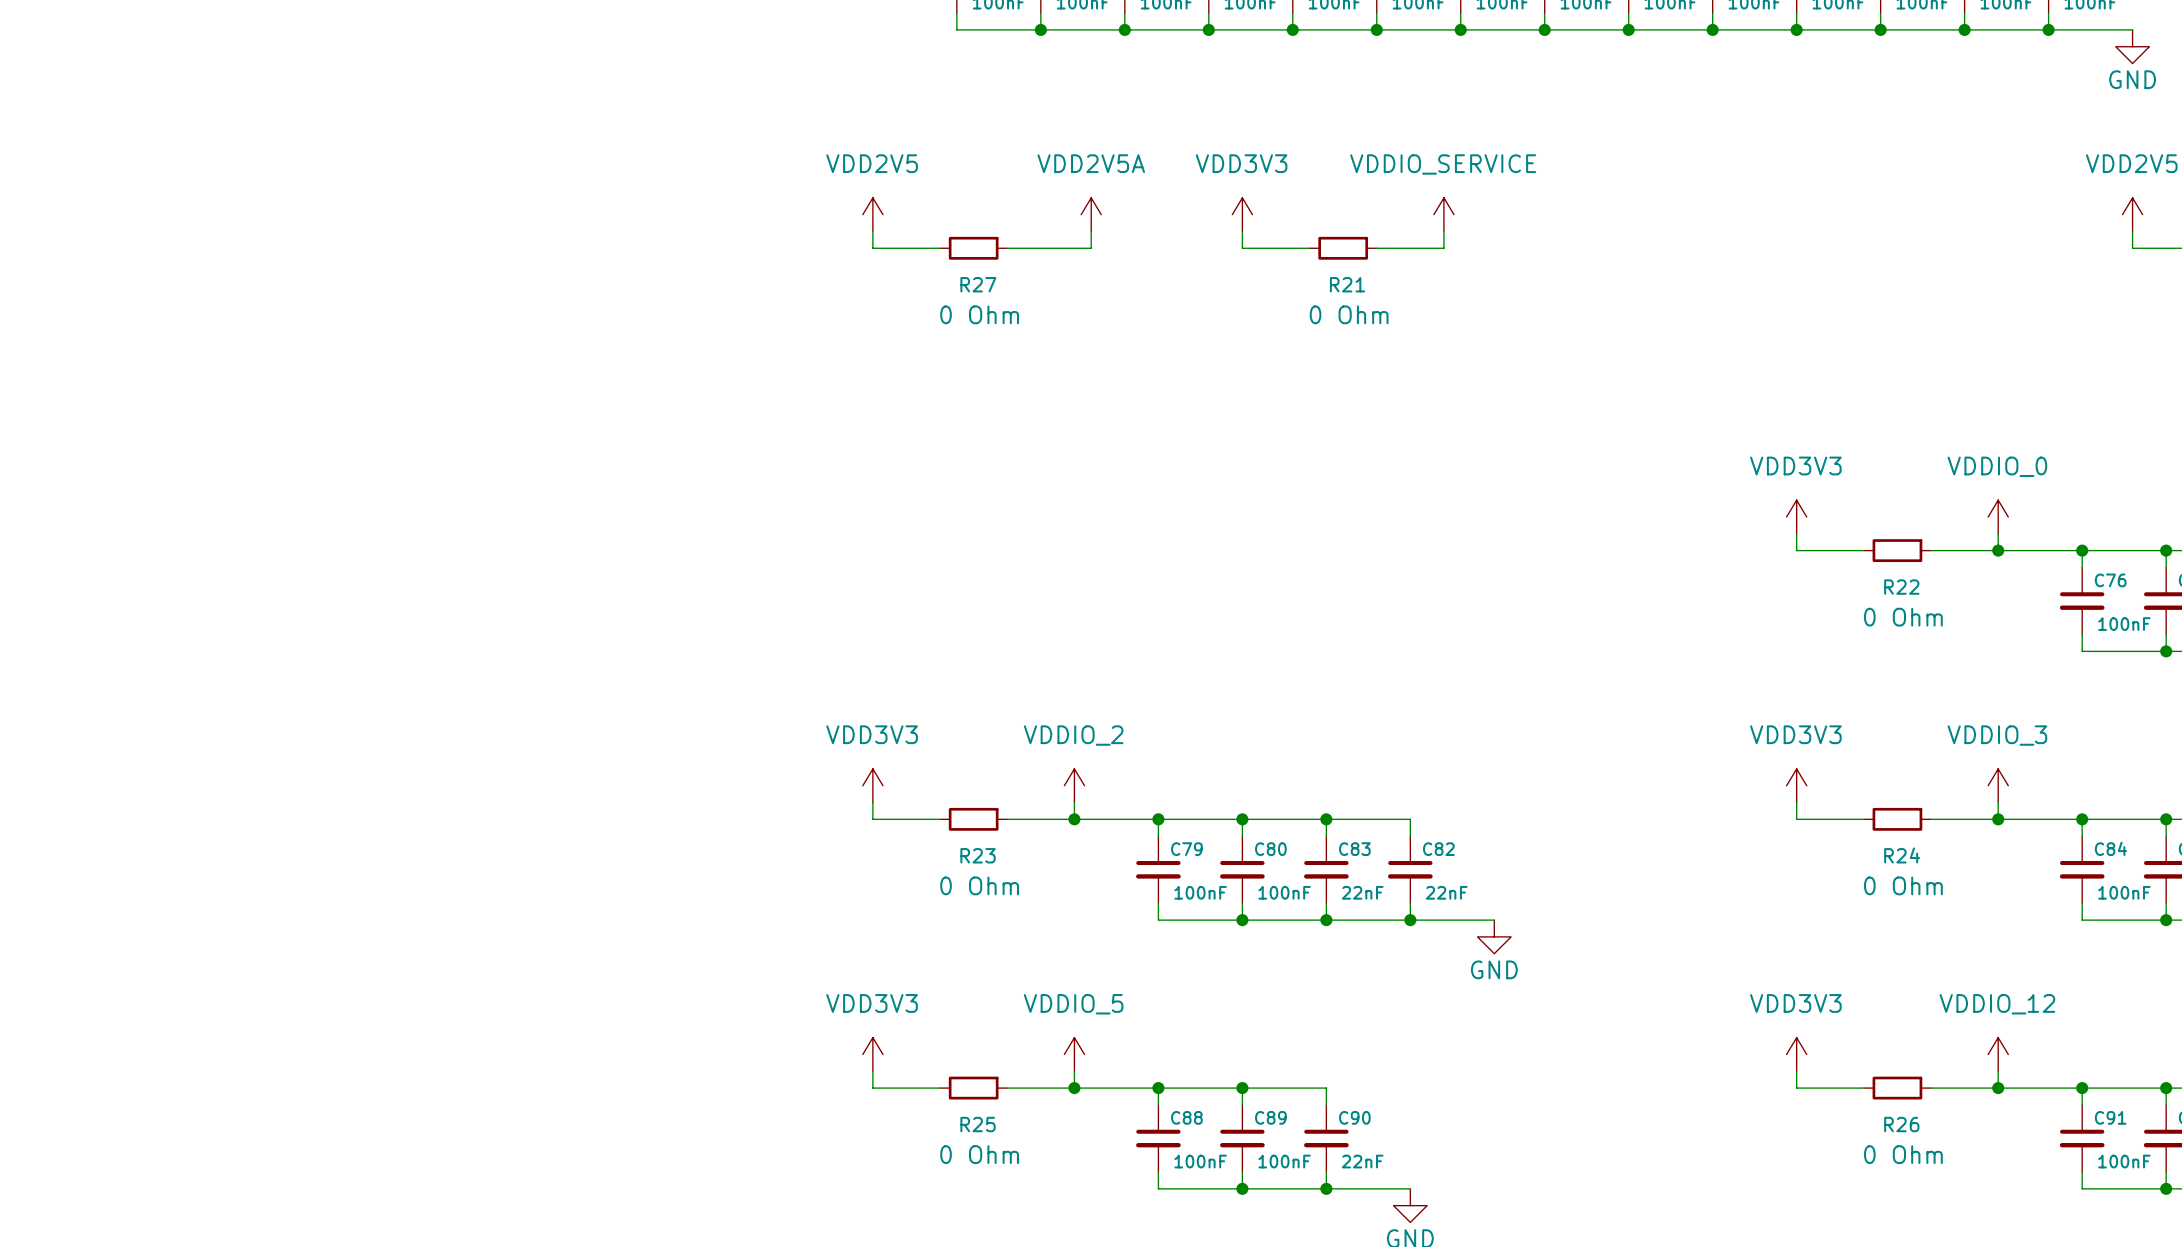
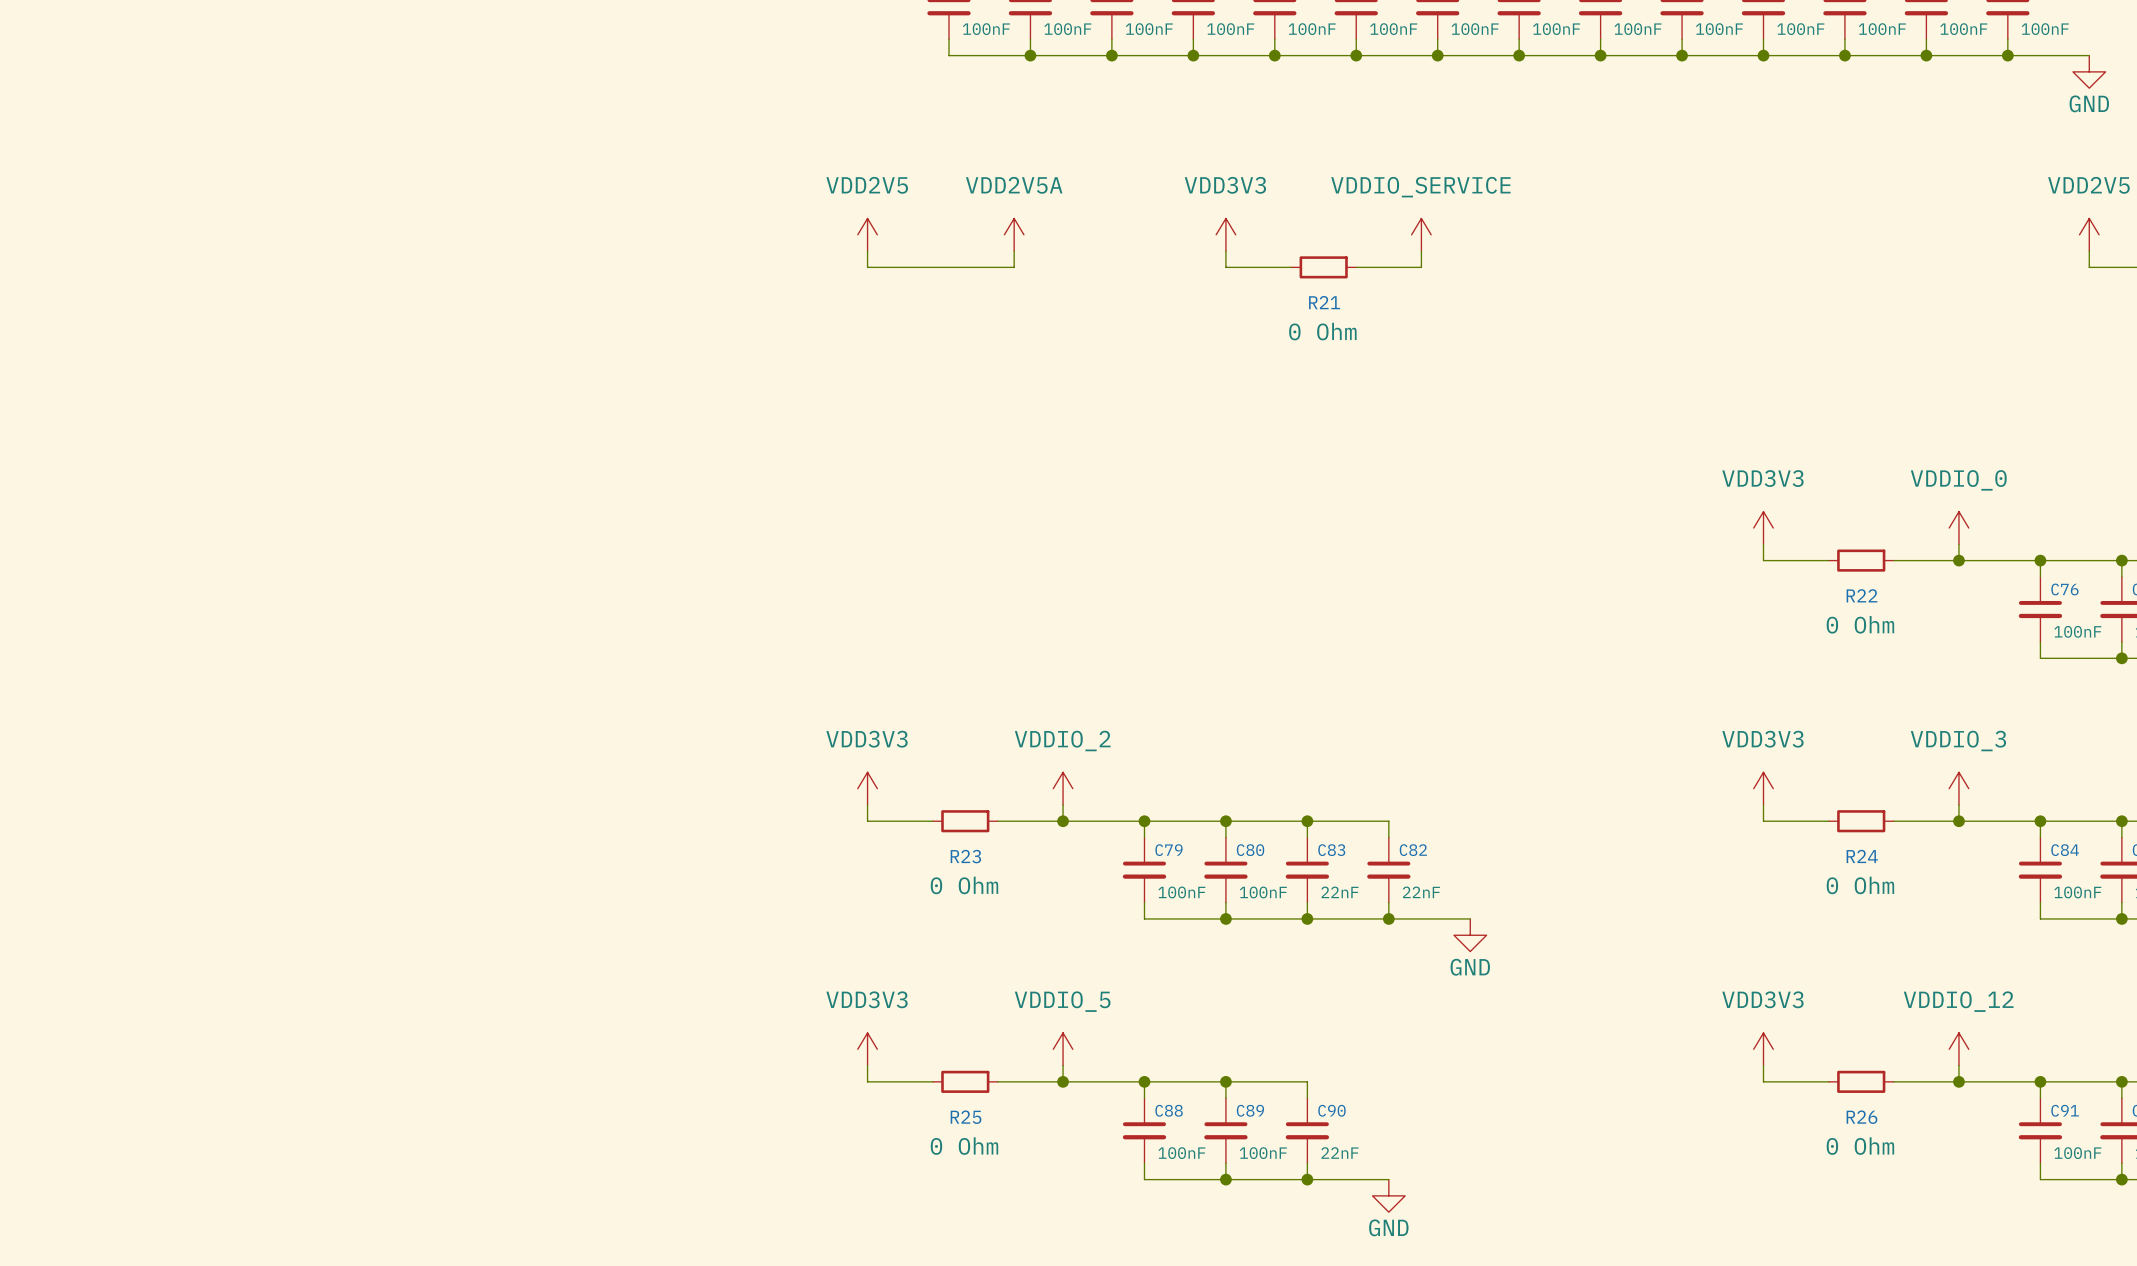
power symbol position: VDD2V5A (1091, 214) -> VDD2V5A (1014, 234)
wire: (1091, 231) (1091, 248) (1024, 248) -> (1014, 251) (1014, 267)
wire: none -> (932, 267) (997, 267)
R27: 0 Ohm (973, 248) -> none

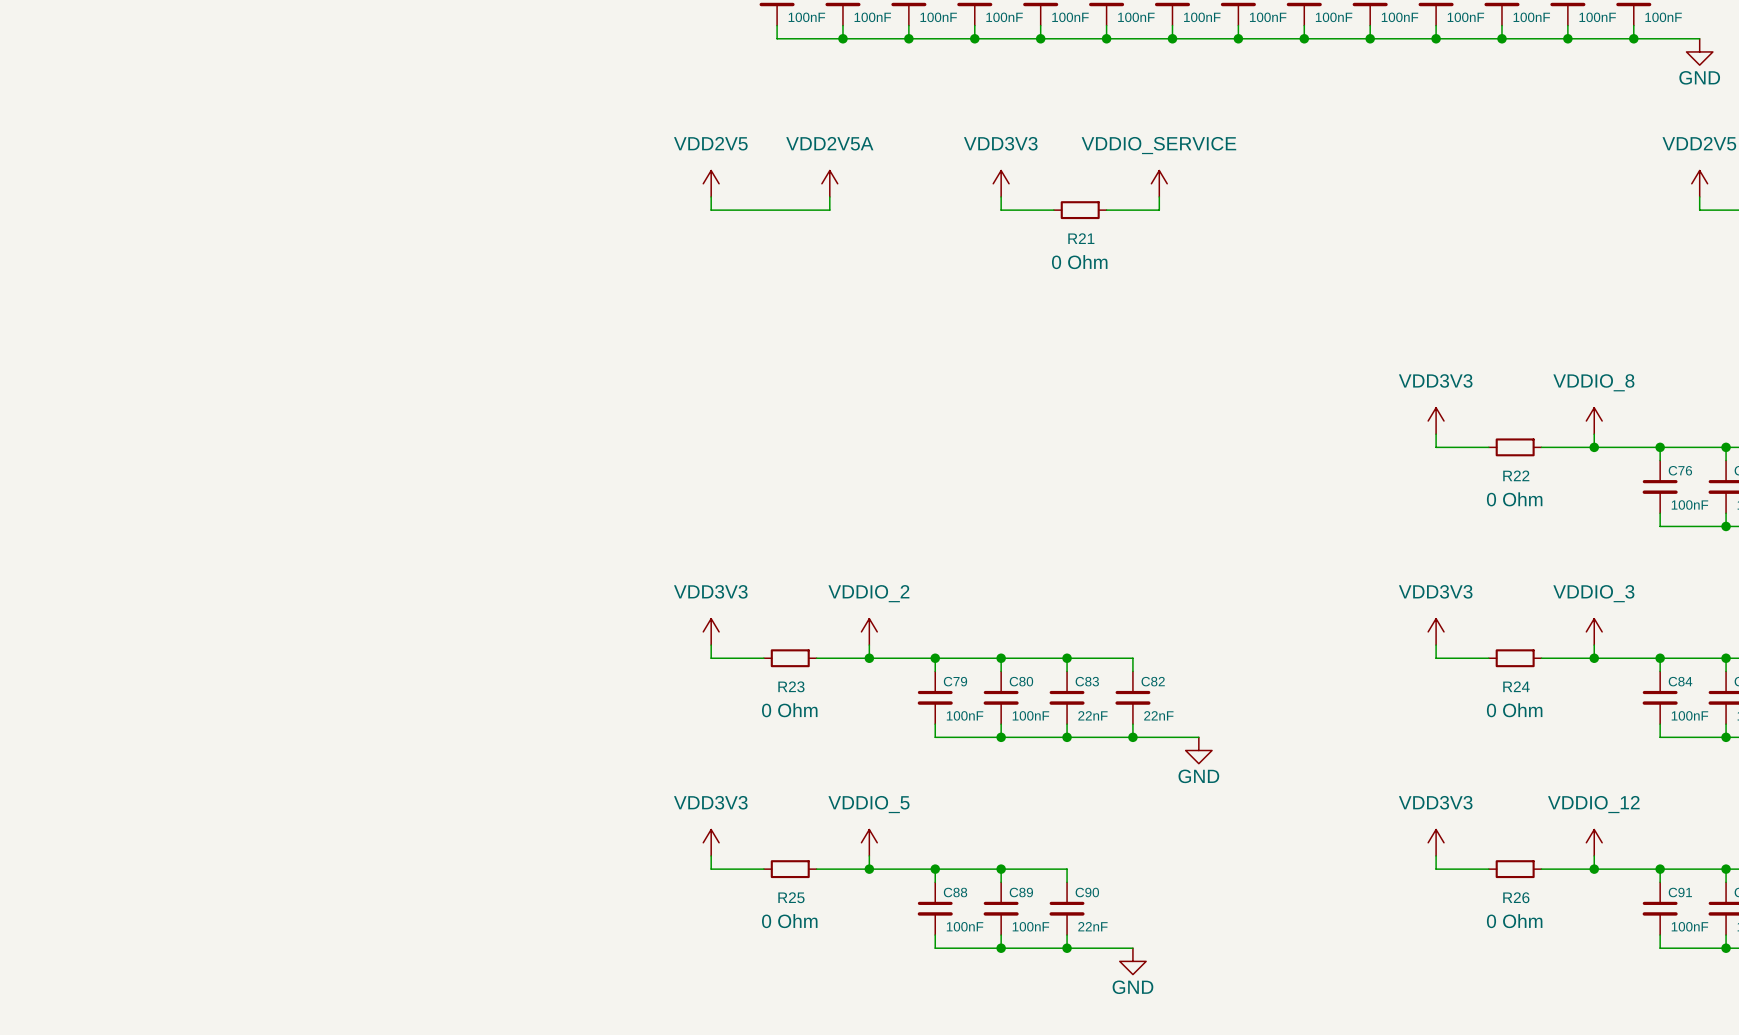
power symbol: VDDIO_0 (1958, 528) -> VDDIO_8 (1594, 421)

